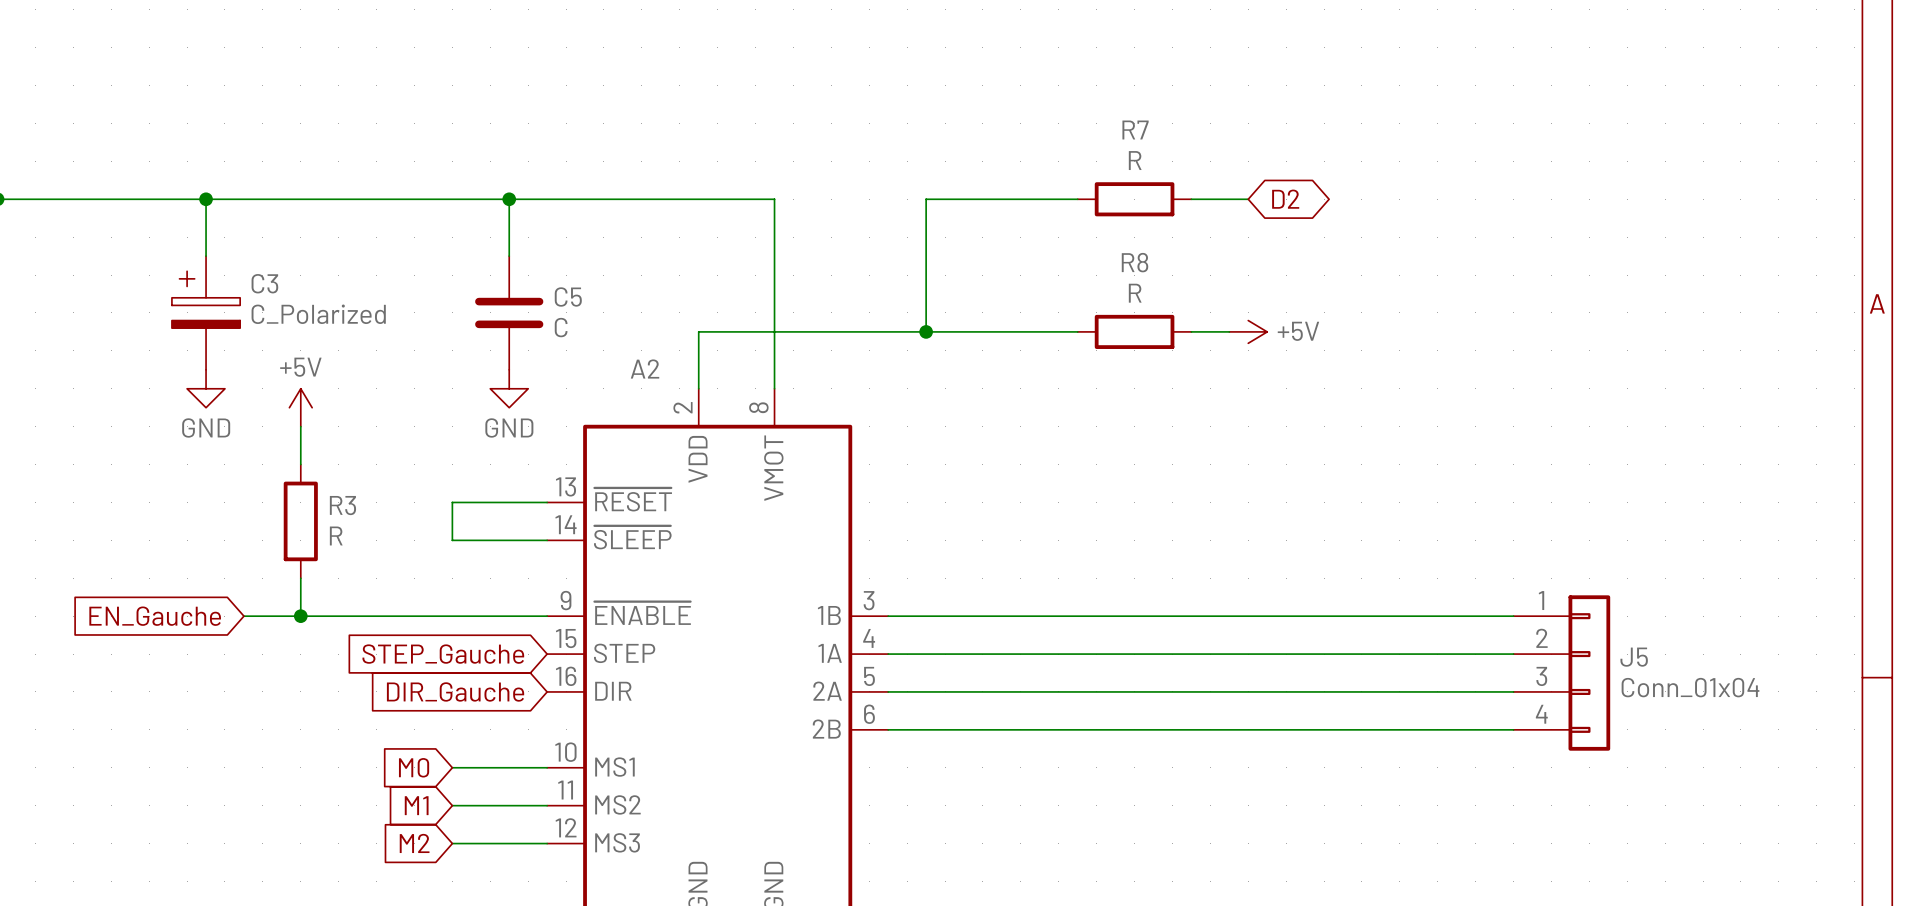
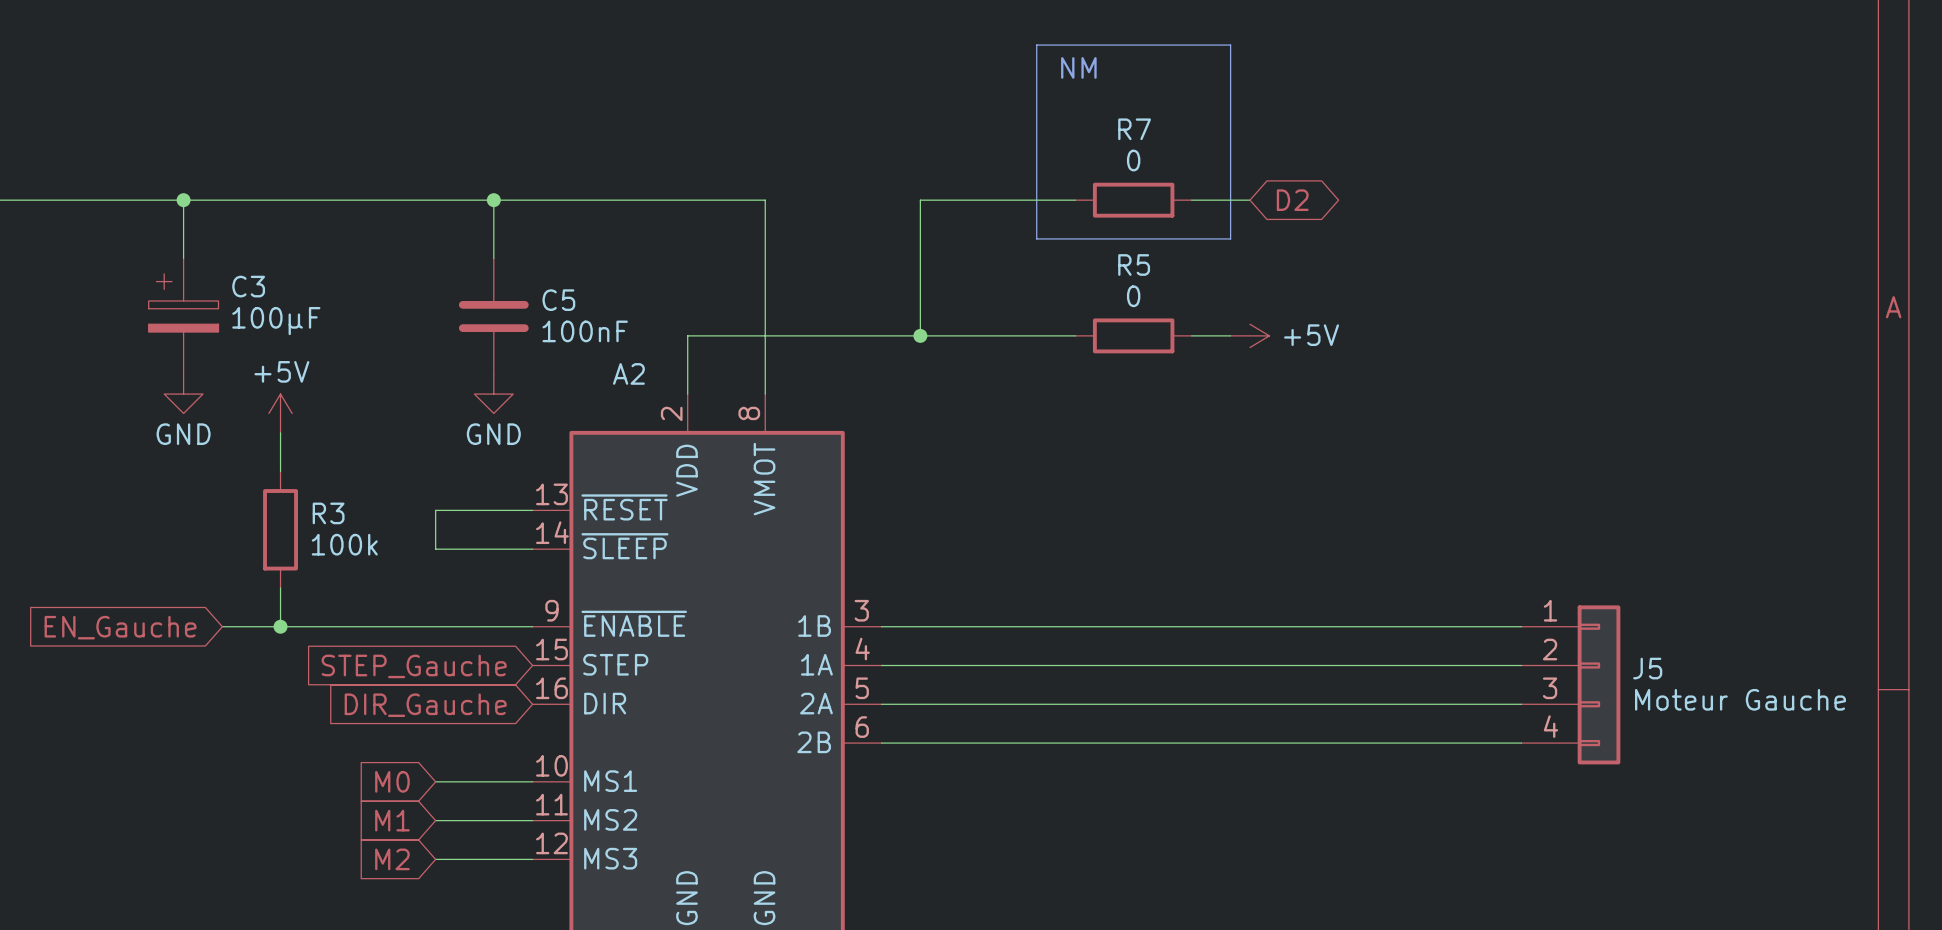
line: none -> (1036, 45) (1230, 45) (1230, 238) (1036, 238) (1036, 45)
text: none -> NM (1078, 67)
R7 value: R (1135, 160) -> 0 (1133, 160)
R8 name: R8 (1135, 262) -> R5 (1134, 265)
R8 value: R (1135, 293) -> 0 (1133, 296)
C3 value: C_Polarized (318, 314) -> 100µF (276, 321)
C5 value: C (561, 327) -> 100nF (585, 331)
R3 value: R (336, 535) -> 100k (344, 544)
J5 value: Conn_01x04 (1690, 687) -> Moteur Gauche (1740, 699)

